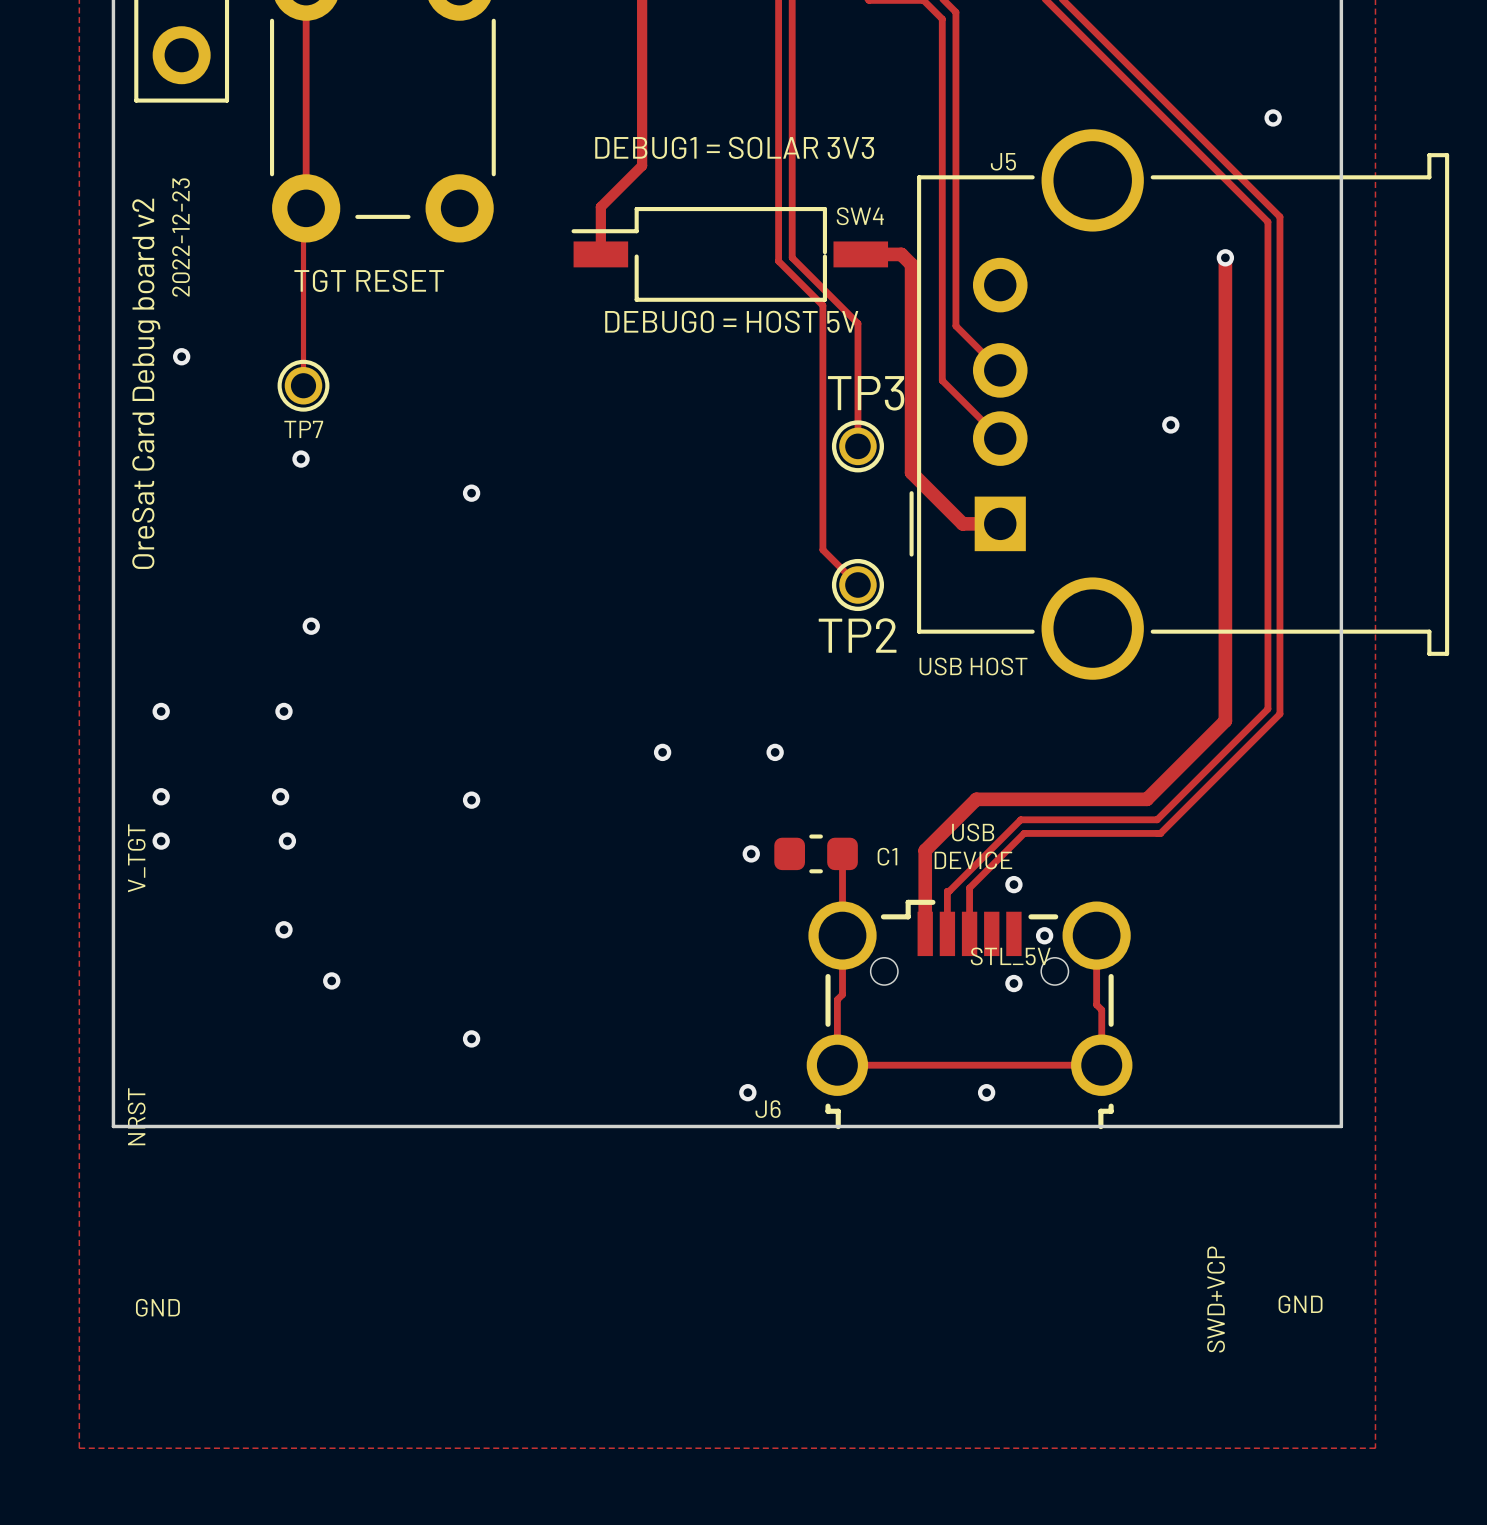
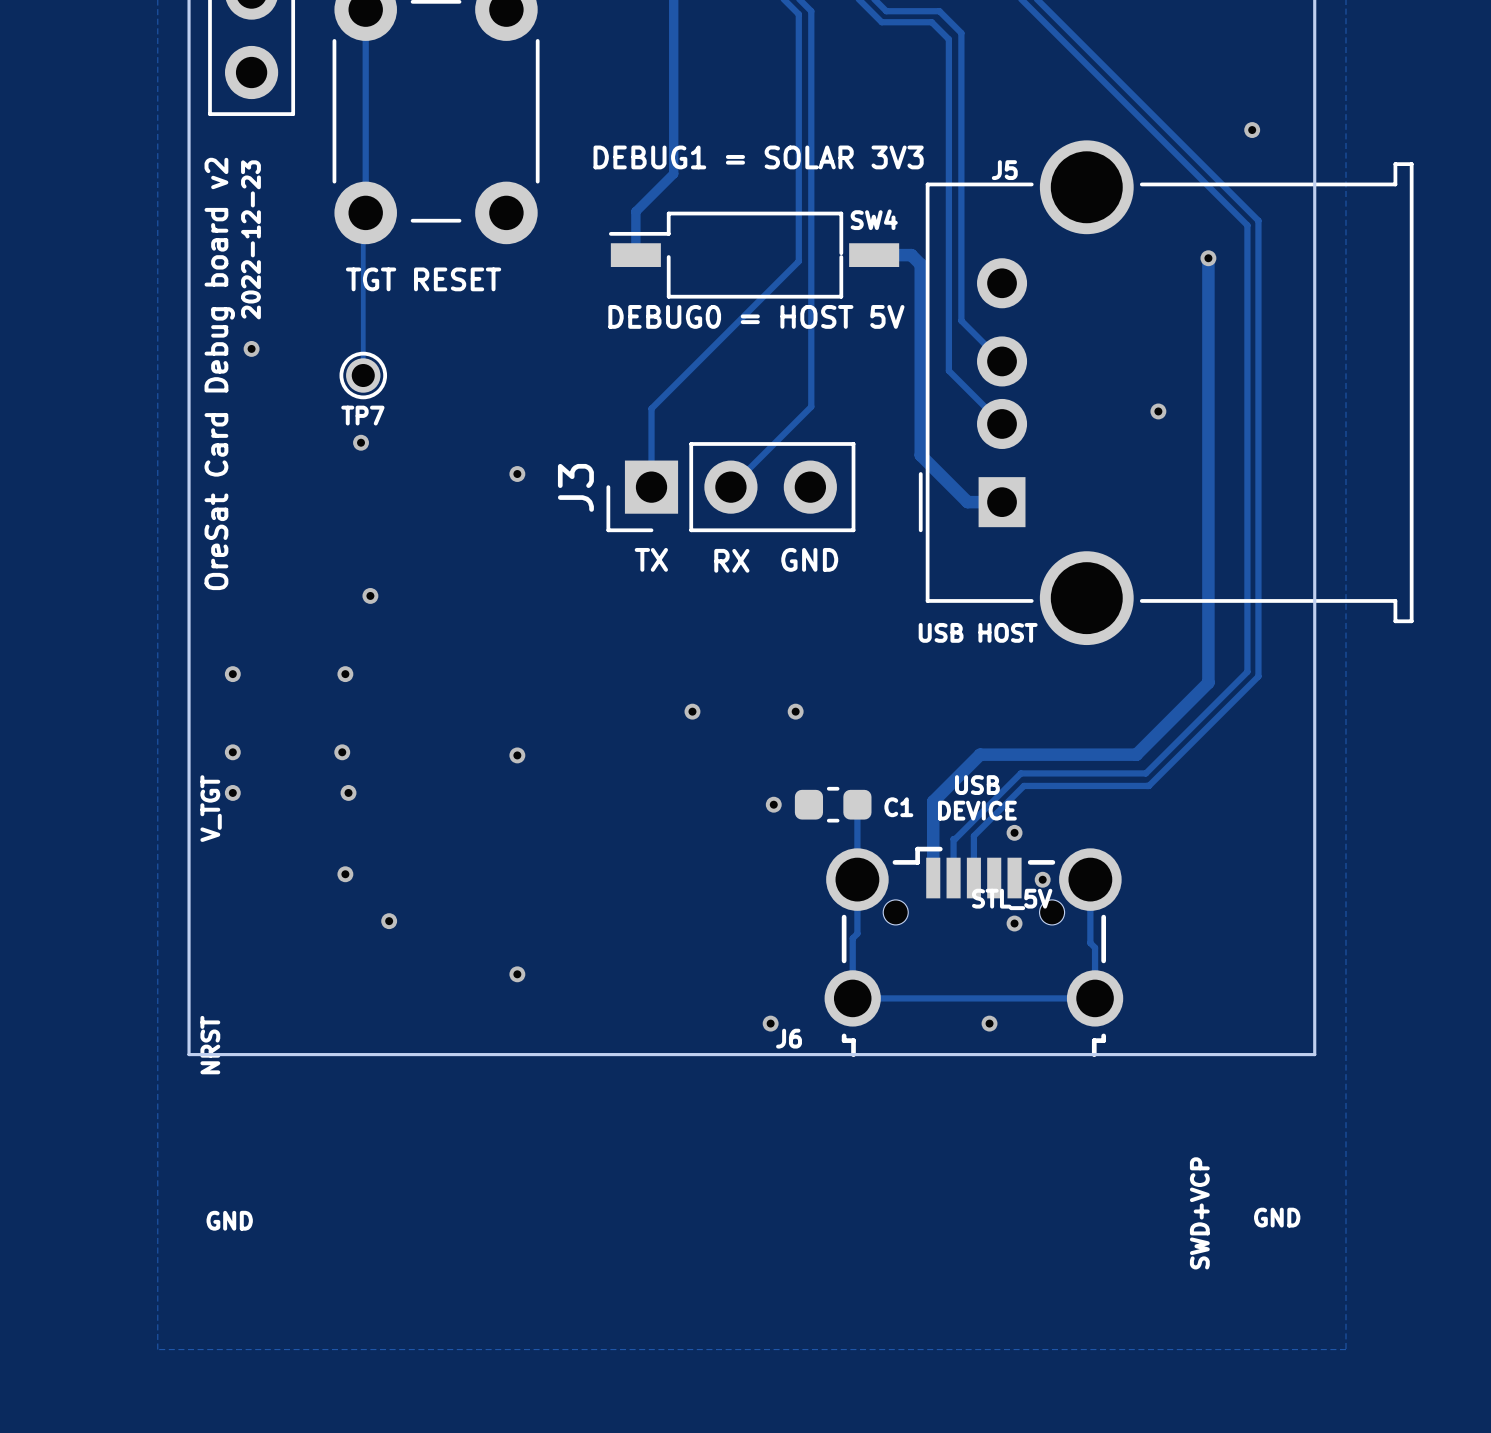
track: (792, 257) (857, 323) (857, 446) -> (811, 258) (811, 406) (730, 487)
track: (778, 261) (822, 305) (822, 549) (857, 584) -> (798, 261) (651, 408) (651, 487)
TP3: (857, 446) -> none
J3: none -> (730, 487)
TP2: (857, 584) -> none
text: none -> TX (651, 559)
text: none -> GND (809, 559)
text: none -> RX (731, 560)

